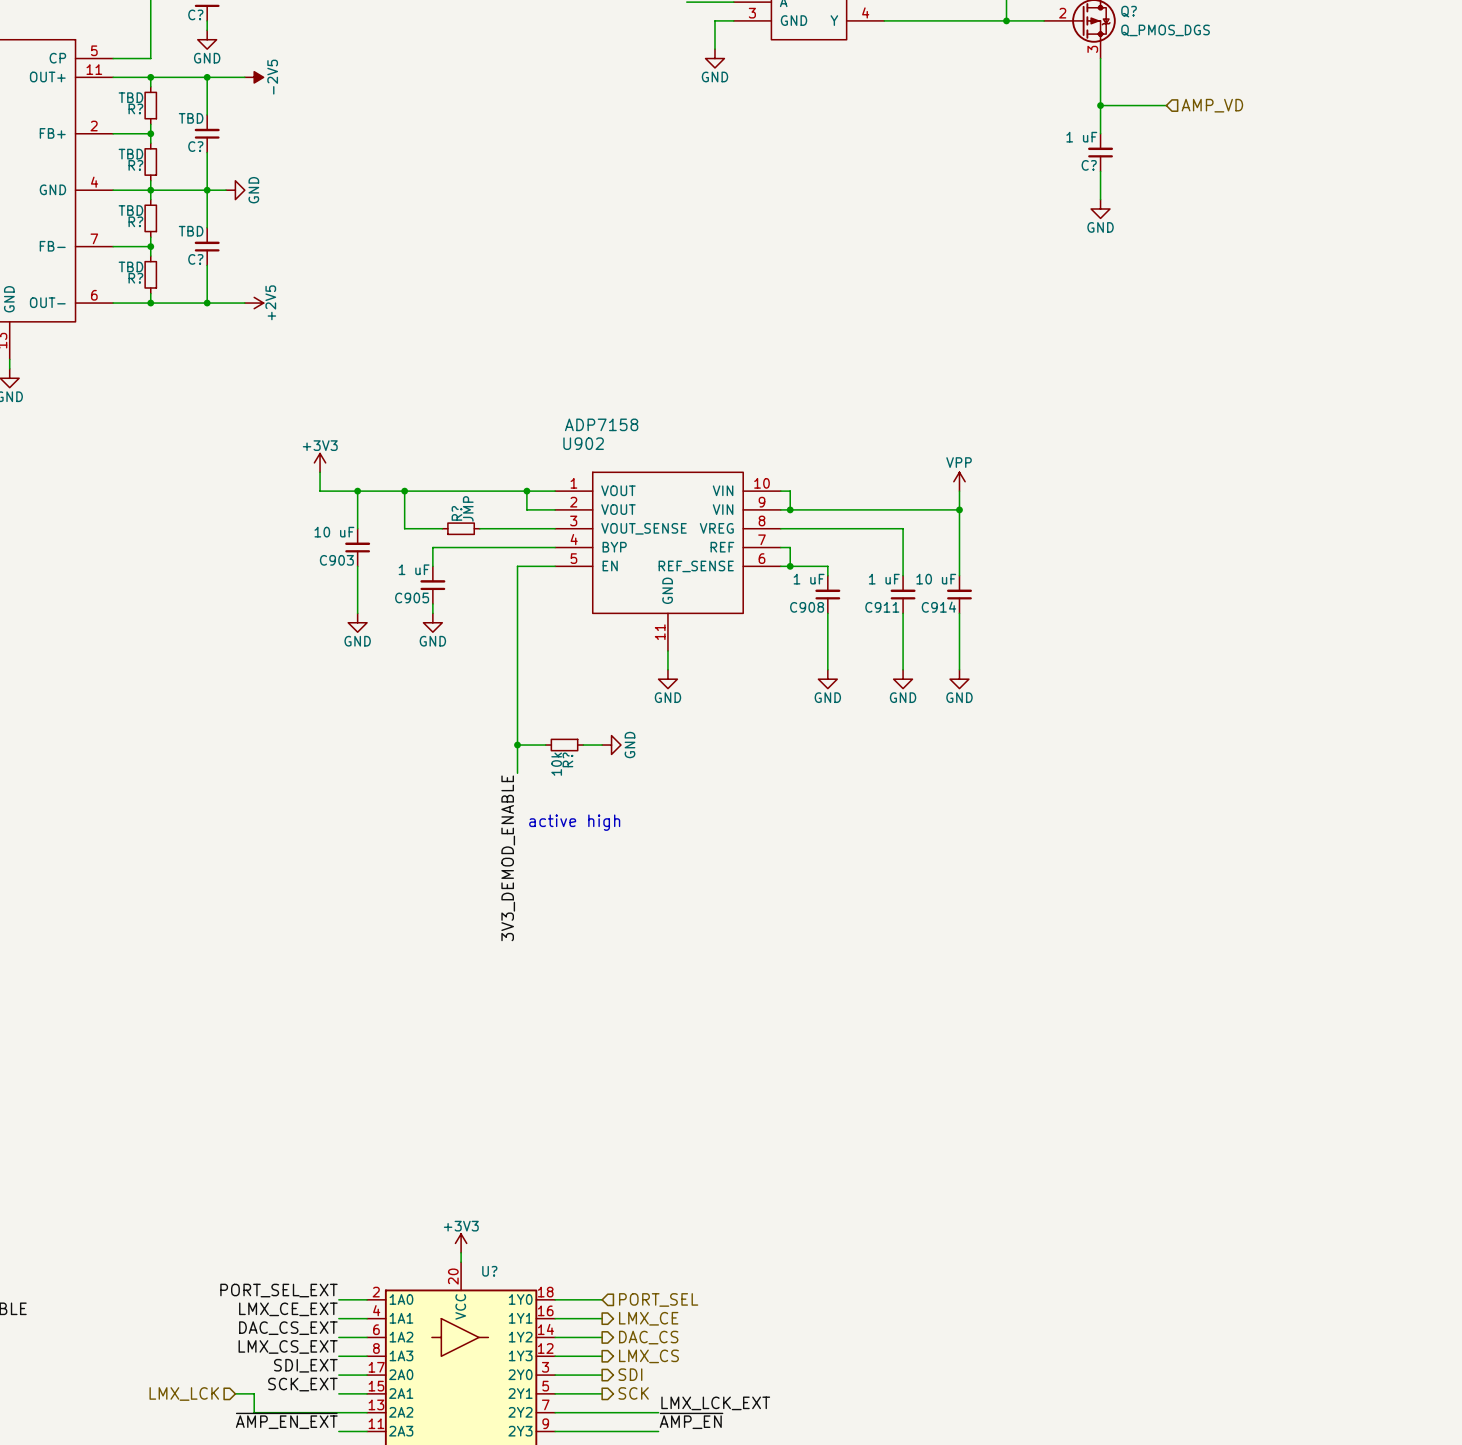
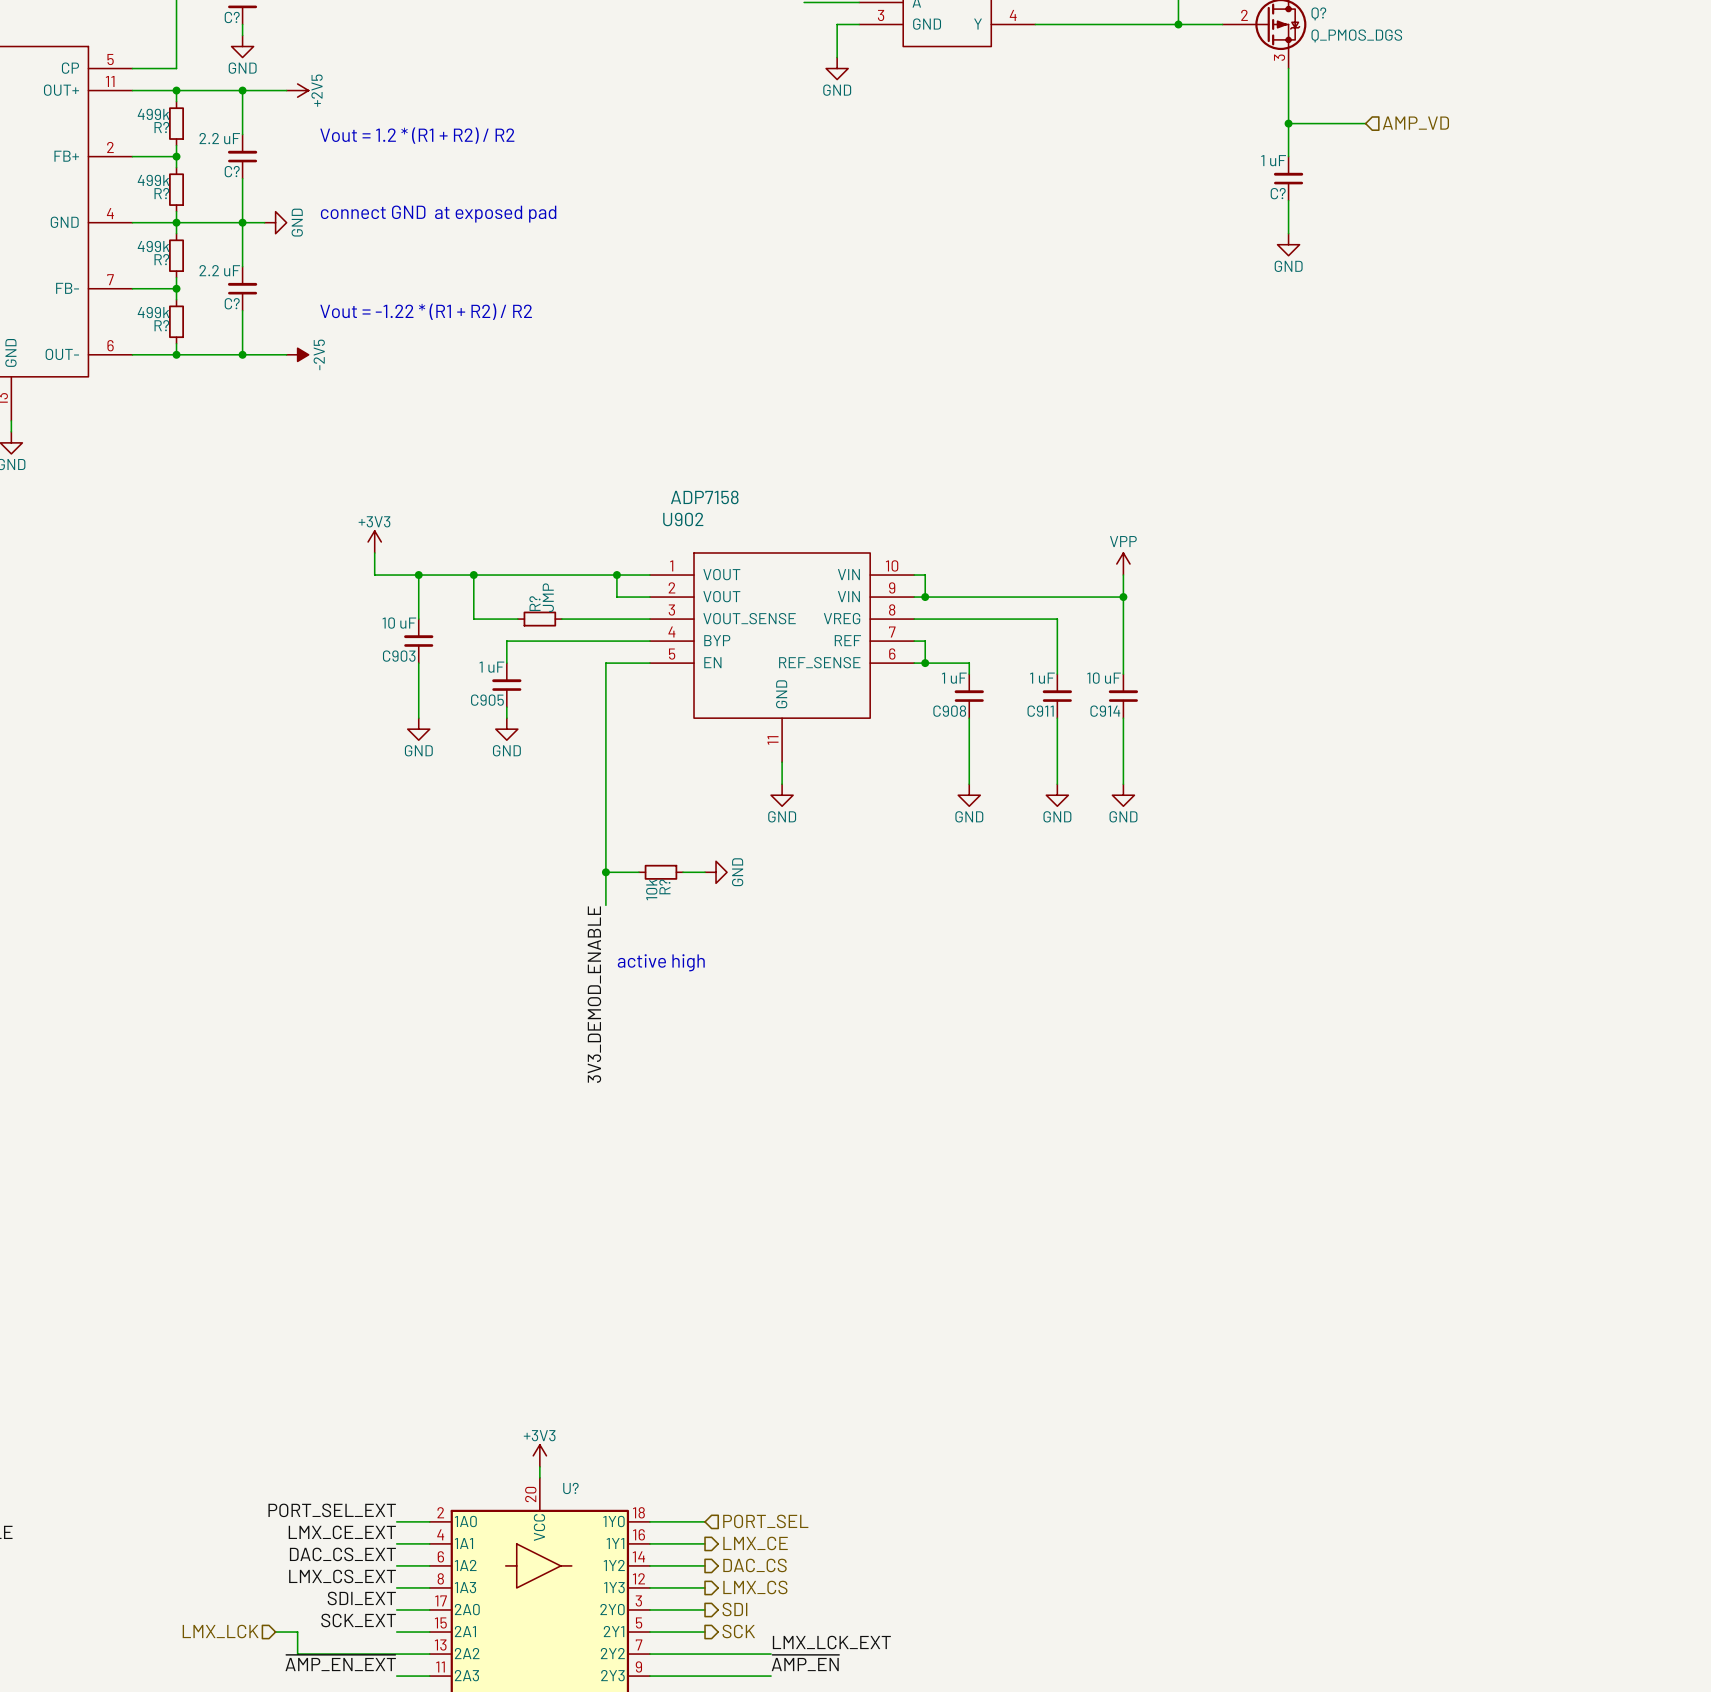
power symbol: -2V5 (254, 77) -> +2V5 (297, 90)
R? value: TBD (130, 97) -> 499k (153, 114)
text: none -> Vout = 1.2 * (R1 + R2) / R2 (417, 135)
C? value: TBD (191, 118) -> 2.2 uF (219, 138)
R? value: TBD (130, 154) -> 499k (153, 180)
text: none -> connect GND at exposed pad (438, 214)
R? value: TBD (130, 210) -> 499k (153, 246)
C? value: TBD (191, 231) -> 2.2 uF (219, 270)
R? value: TBD (130, 266) -> 499k (153, 312)
text: none -> Vout = -1.22 * (R1 + R2) / R2 (426, 311)
power symbol: +2V5 (254, 303) -> -2V5 (297, 354)

